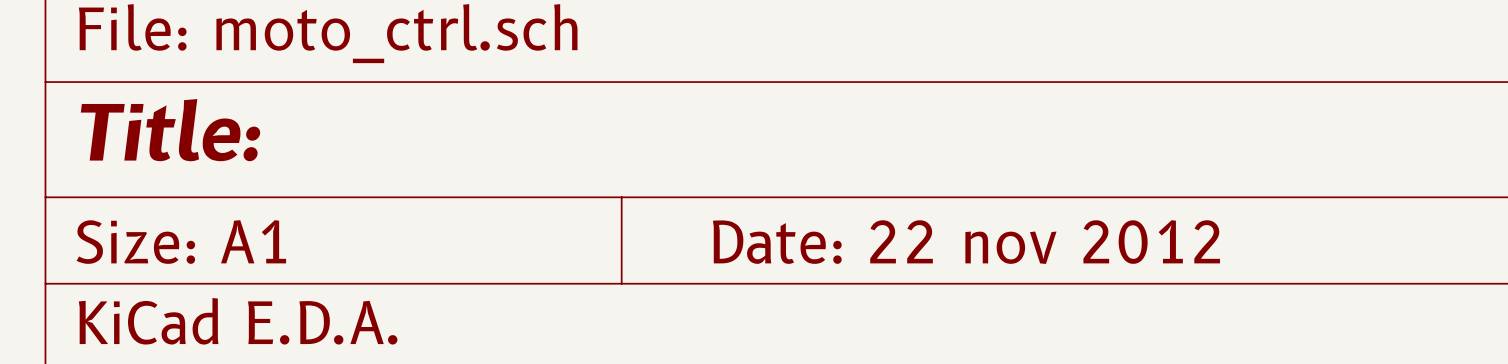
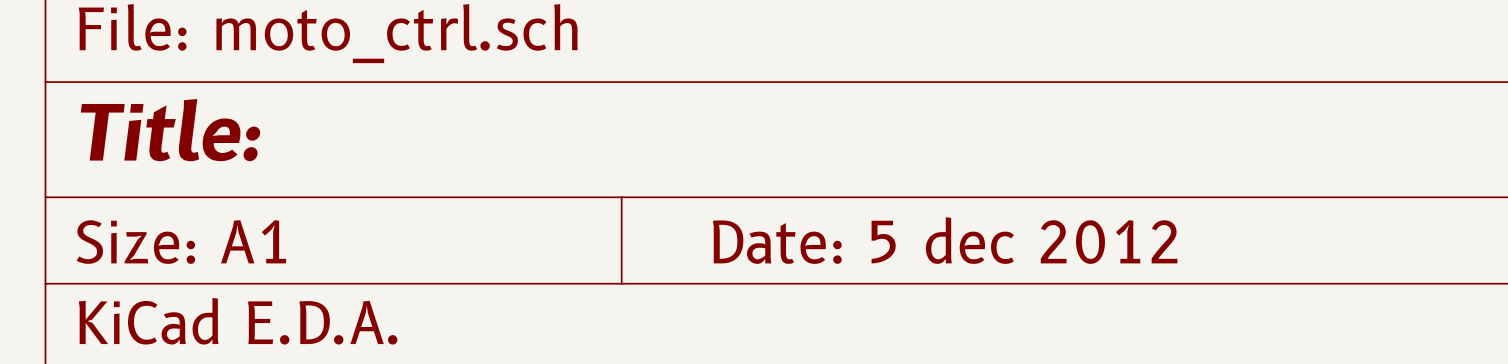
title block: Date: 22 nov 2012 (966, 242) -> Date: 5 dec 2012 (945, 240)

